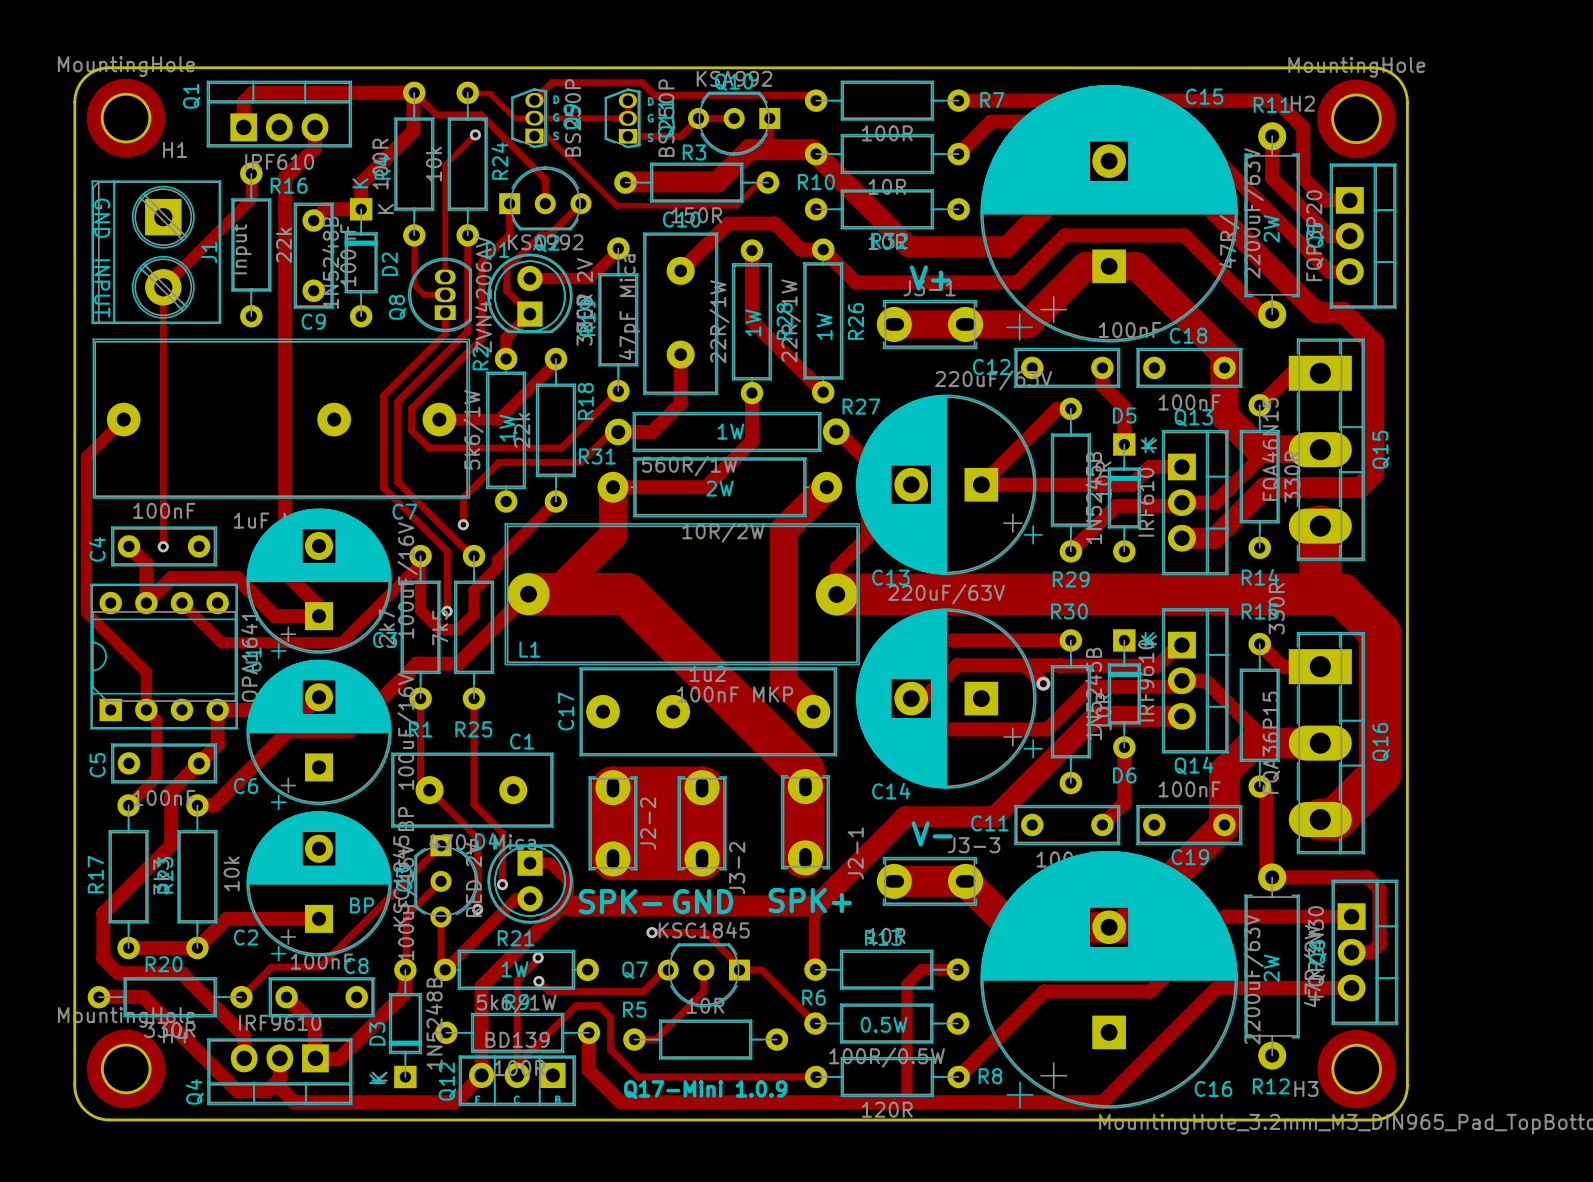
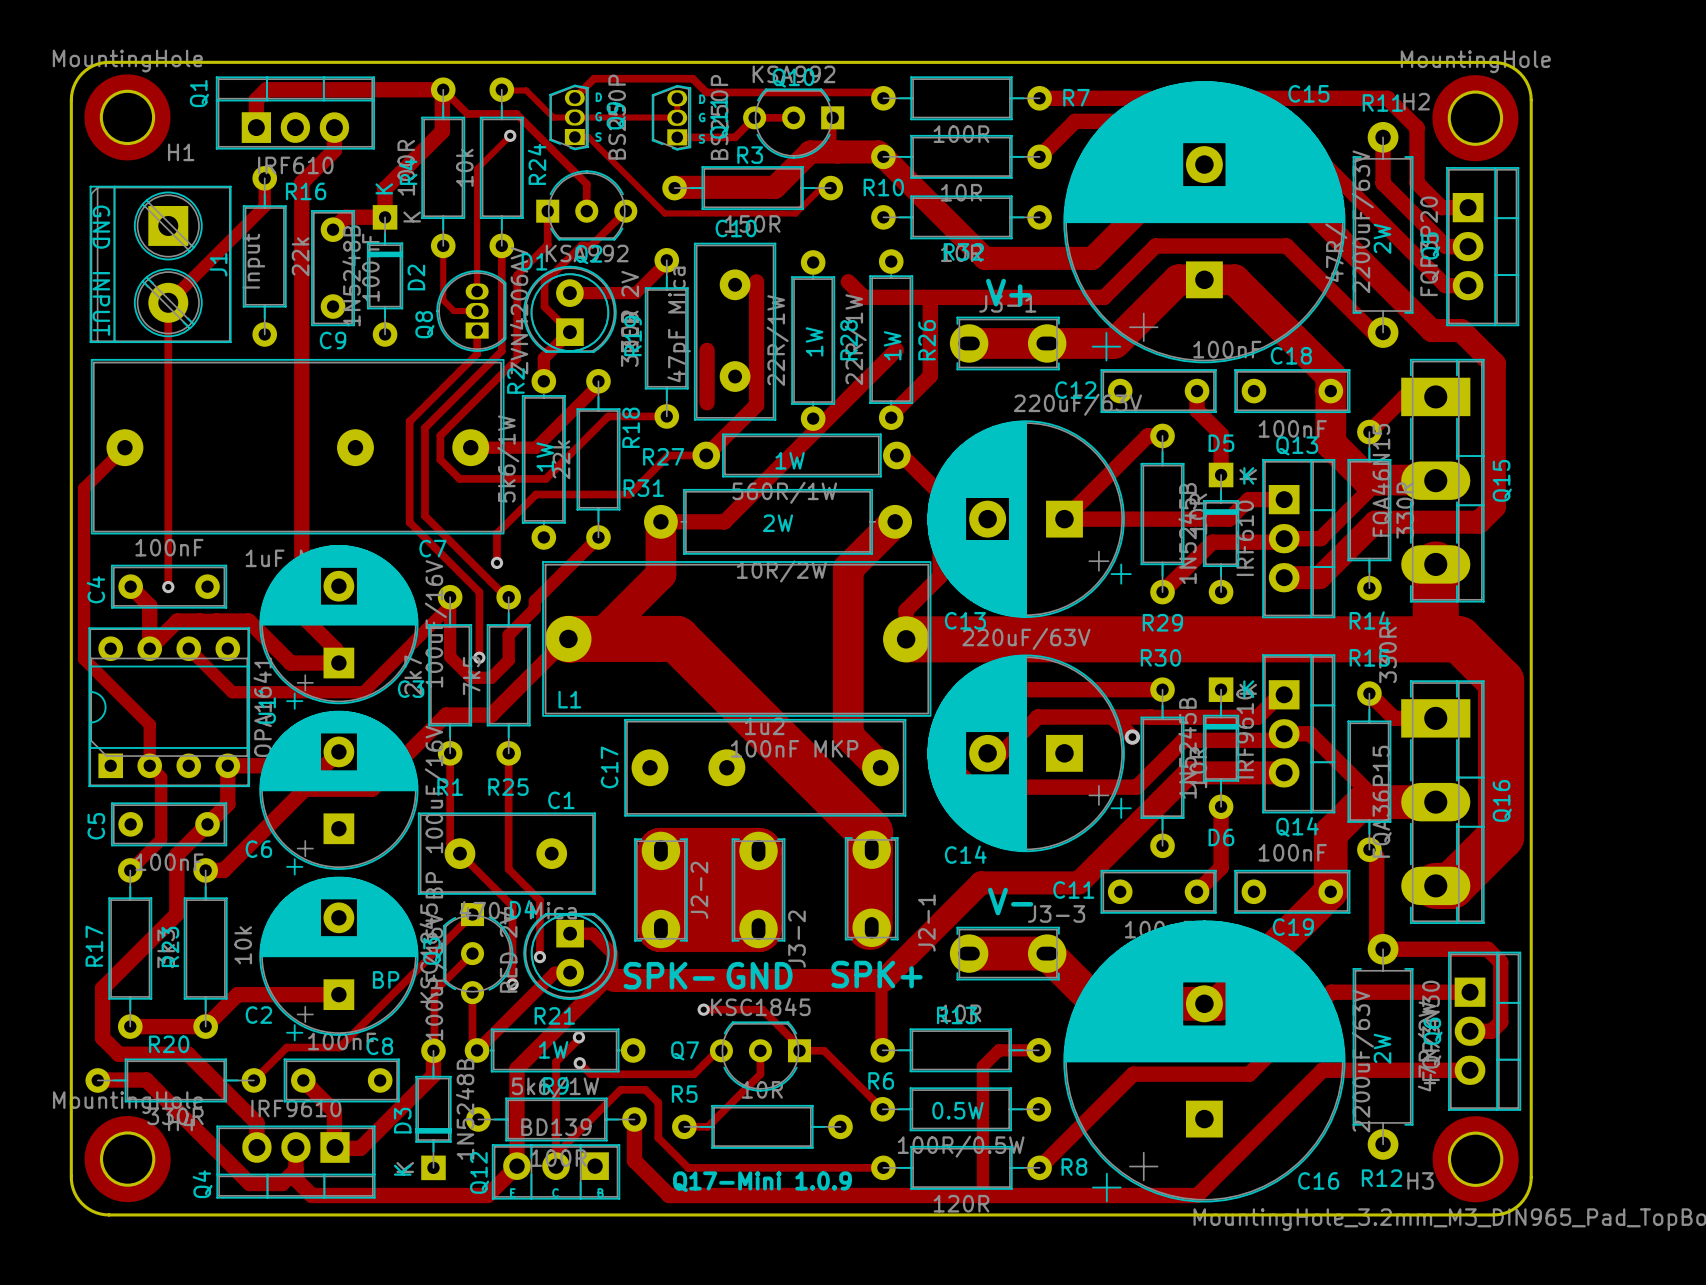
track: (751, 250) (751, 320) (823, 392) -> none
track: (680, 270) (727, 223) (775, 223) (801, 249) (823, 249) (855, 282) -> (848, 281) (863, 297) (927, 297)
track: none -> (930, 300) (930, 375) (897, 408)
track: none -> (707, 350) (707, 402)
track: (680, 354) (680, 403) (652, 432) (616, 432) -> none
track: (618, 391) (561, 448) (507, 448) -> (661, 416) (608, 416) (545, 478)
track: (751, 393) (751, 441) (705, 487) (671, 487) -> (896, 350) (724, 521)
R27 name position: R27 (861, 406) -> R27 (663, 456)
R27 footprint: [604, 411, 850, 453] -> [692, 433, 911, 478]
track: (611, 432) (580, 462) -> (756, 281) (756, 405) (706, 455) (668, 455) (629, 494) (625, 494)

